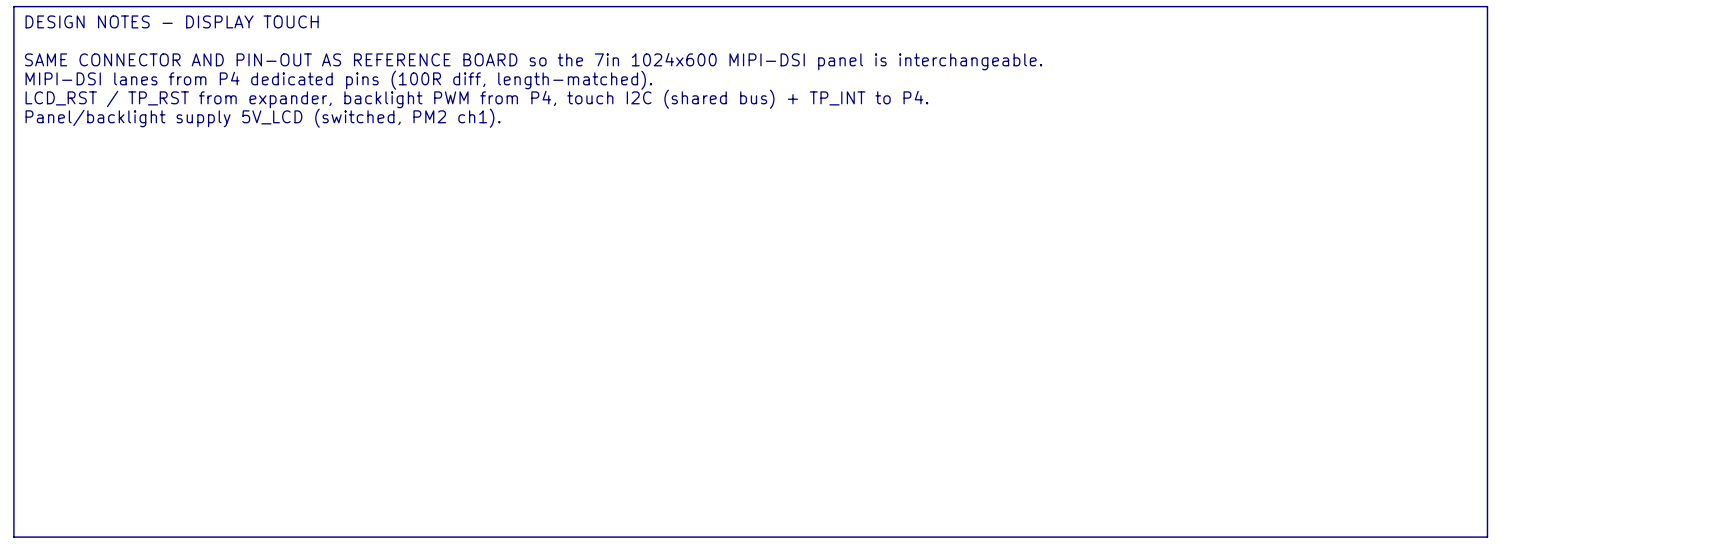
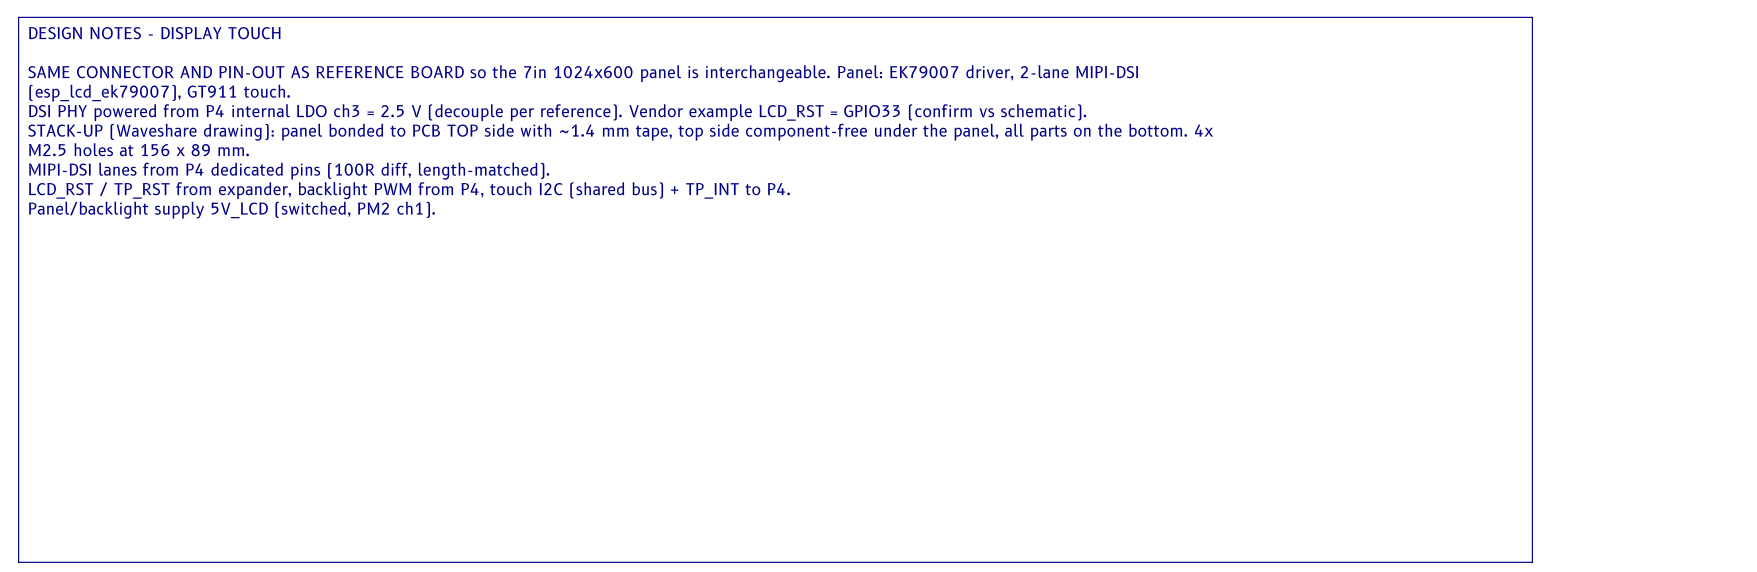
text: SAME CONNECTOR AND PIN-OUT AS REFERENCE BOARD so the 7in 1024x600 MIPI-DSI panel is interchangeable. (533, 61) -> SAME CONNECTOR AND PIN-OUT AS REFERENCE BOARD so the 7in 1024x600 panel is interchangeable. Panel: EK79007 driver, 2-lane MIPI-DSI (583, 73)
text: MIPI-DSI lanes from P4 dedicated pins (100R diff, length-matched). (338, 80) -> (esp_lcd_ek79007), GT911 touch. (159, 93)
text: LCD_RST / TP_RST from expander, backlight PWM from P4, touch I2C (shared bus) + TP_INT to P4. (476, 99) -> DSI PHY powered from P4 internal LDO ch3 = 2.5 V (decouple per reference). Vendor example LCD_RST = GPIO33 (confirm vs schematic). (557, 112)
text: Panel/backlight supply 5V_LCD (switched, PM2 ch1). (263, 118) -> STACK-UP (Waveshare drawing): panel bonded to PCB TOP side with ~1.4 mm tape, top side component-free under the panel, all parts on the bottom. 4x (620, 132)
text: none -> M2.5 holes at 156 x 89 mm. (138, 149)
text: none -> MIPI-DSI lanes from P4 dedicated pins (100R diff, length-matched). (289, 171)
text: none -> LCD_RST / TP_RST from expander, backlight PWM from P4, touch I2C (shared bus) + TP_INT to P4. (409, 190)
text: none -> Panel/backlight supply 5V_LCD (switched, PM2 ch1). (231, 210)

